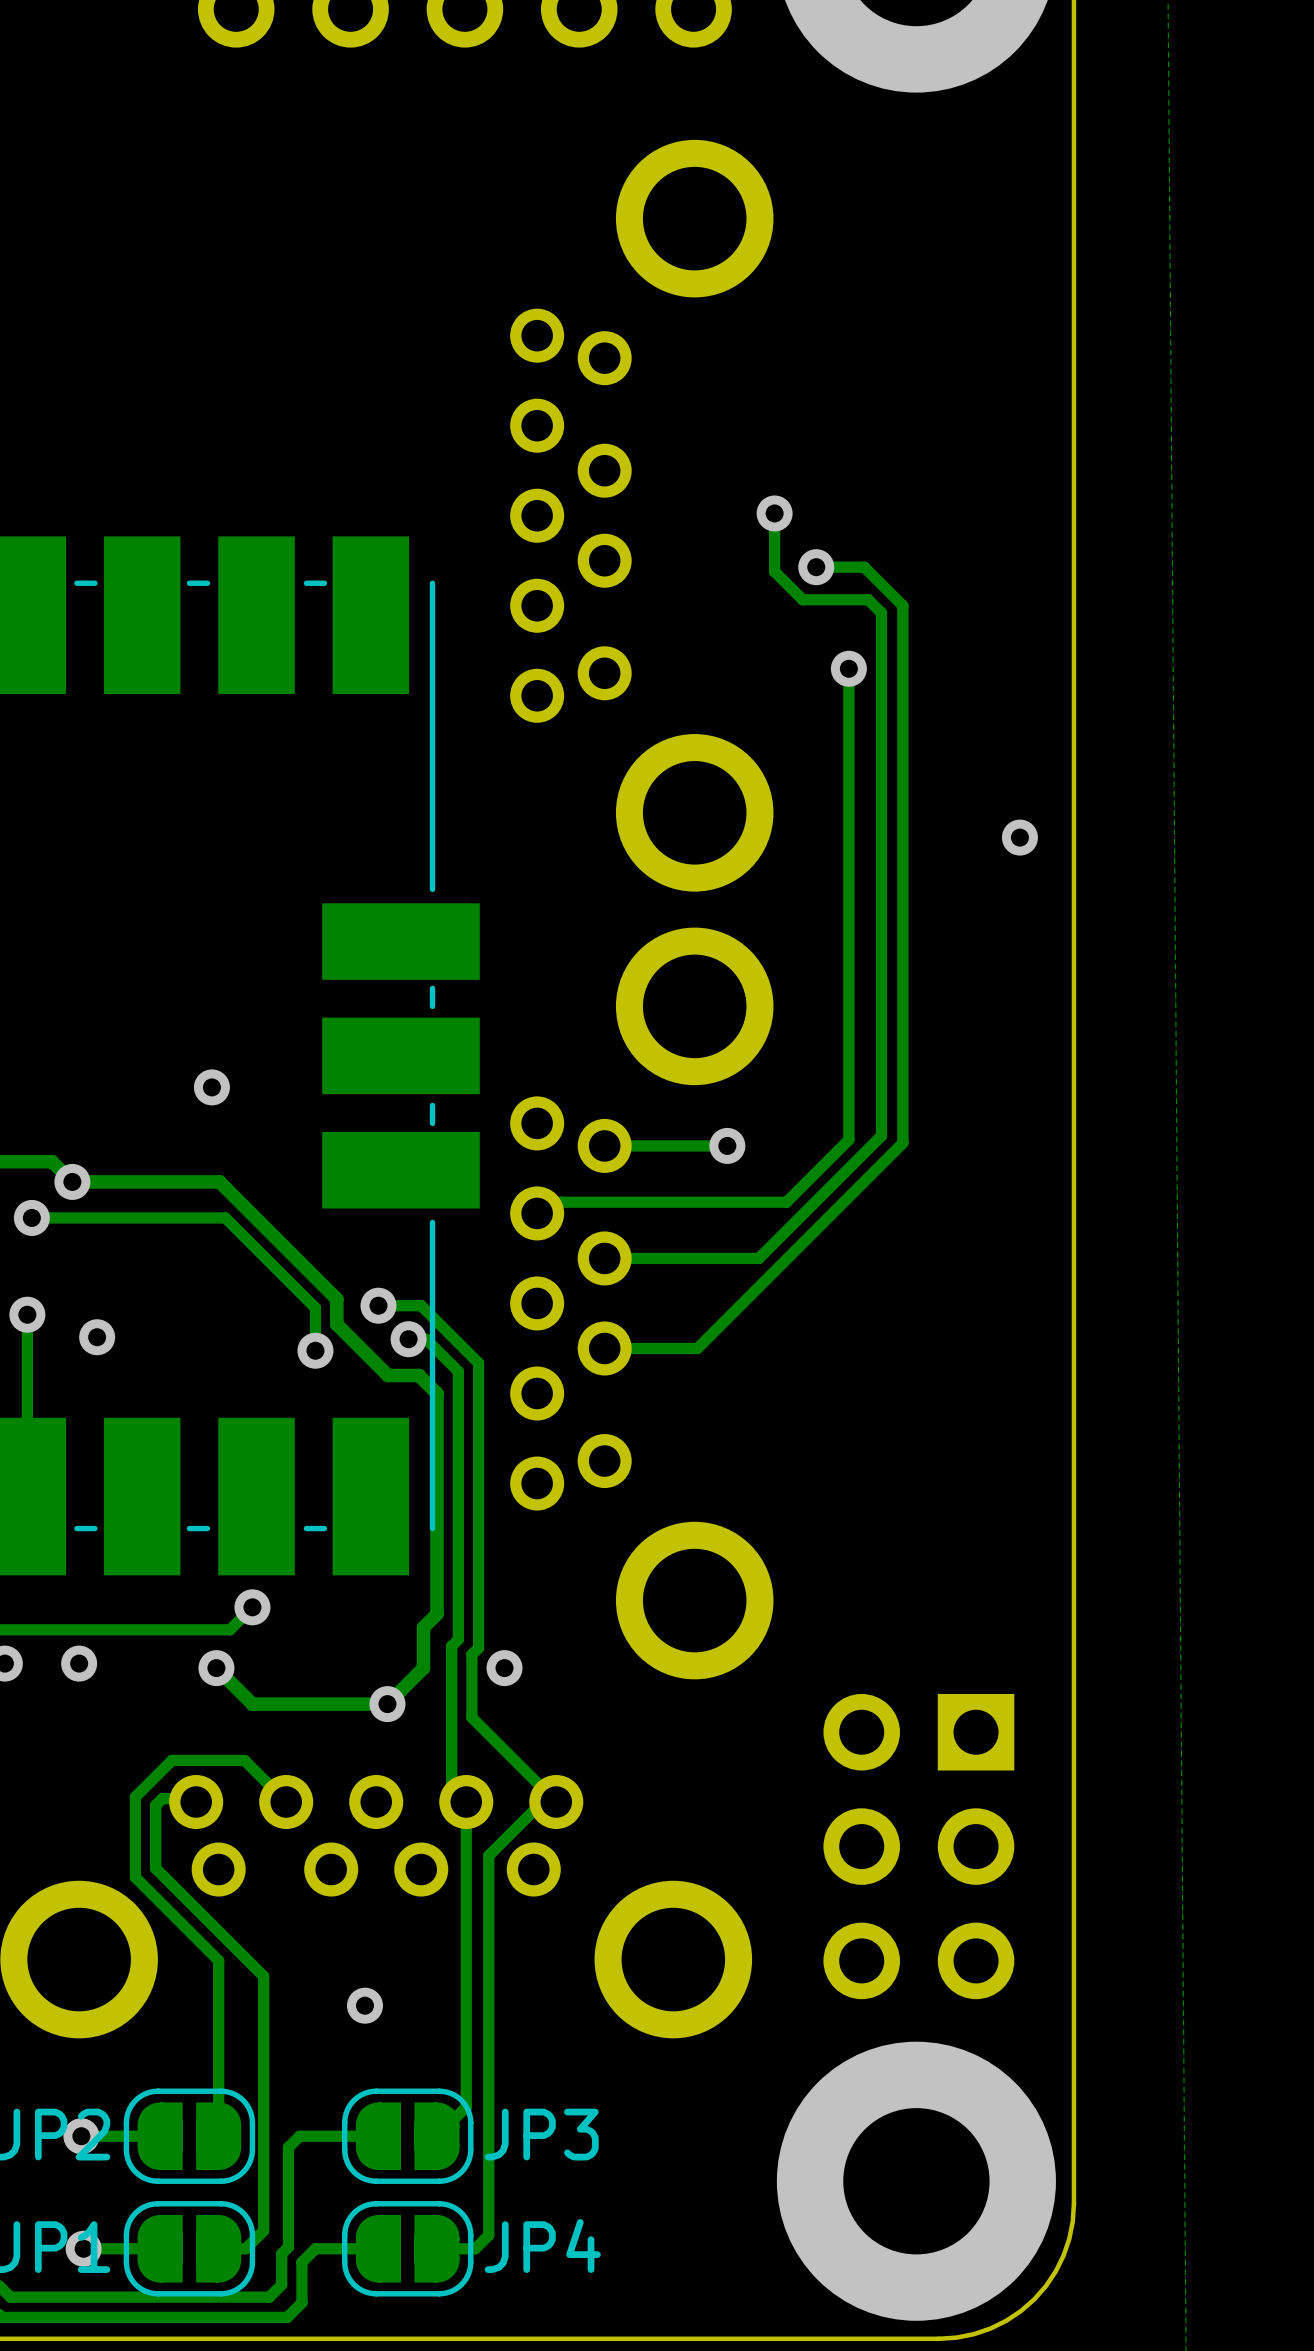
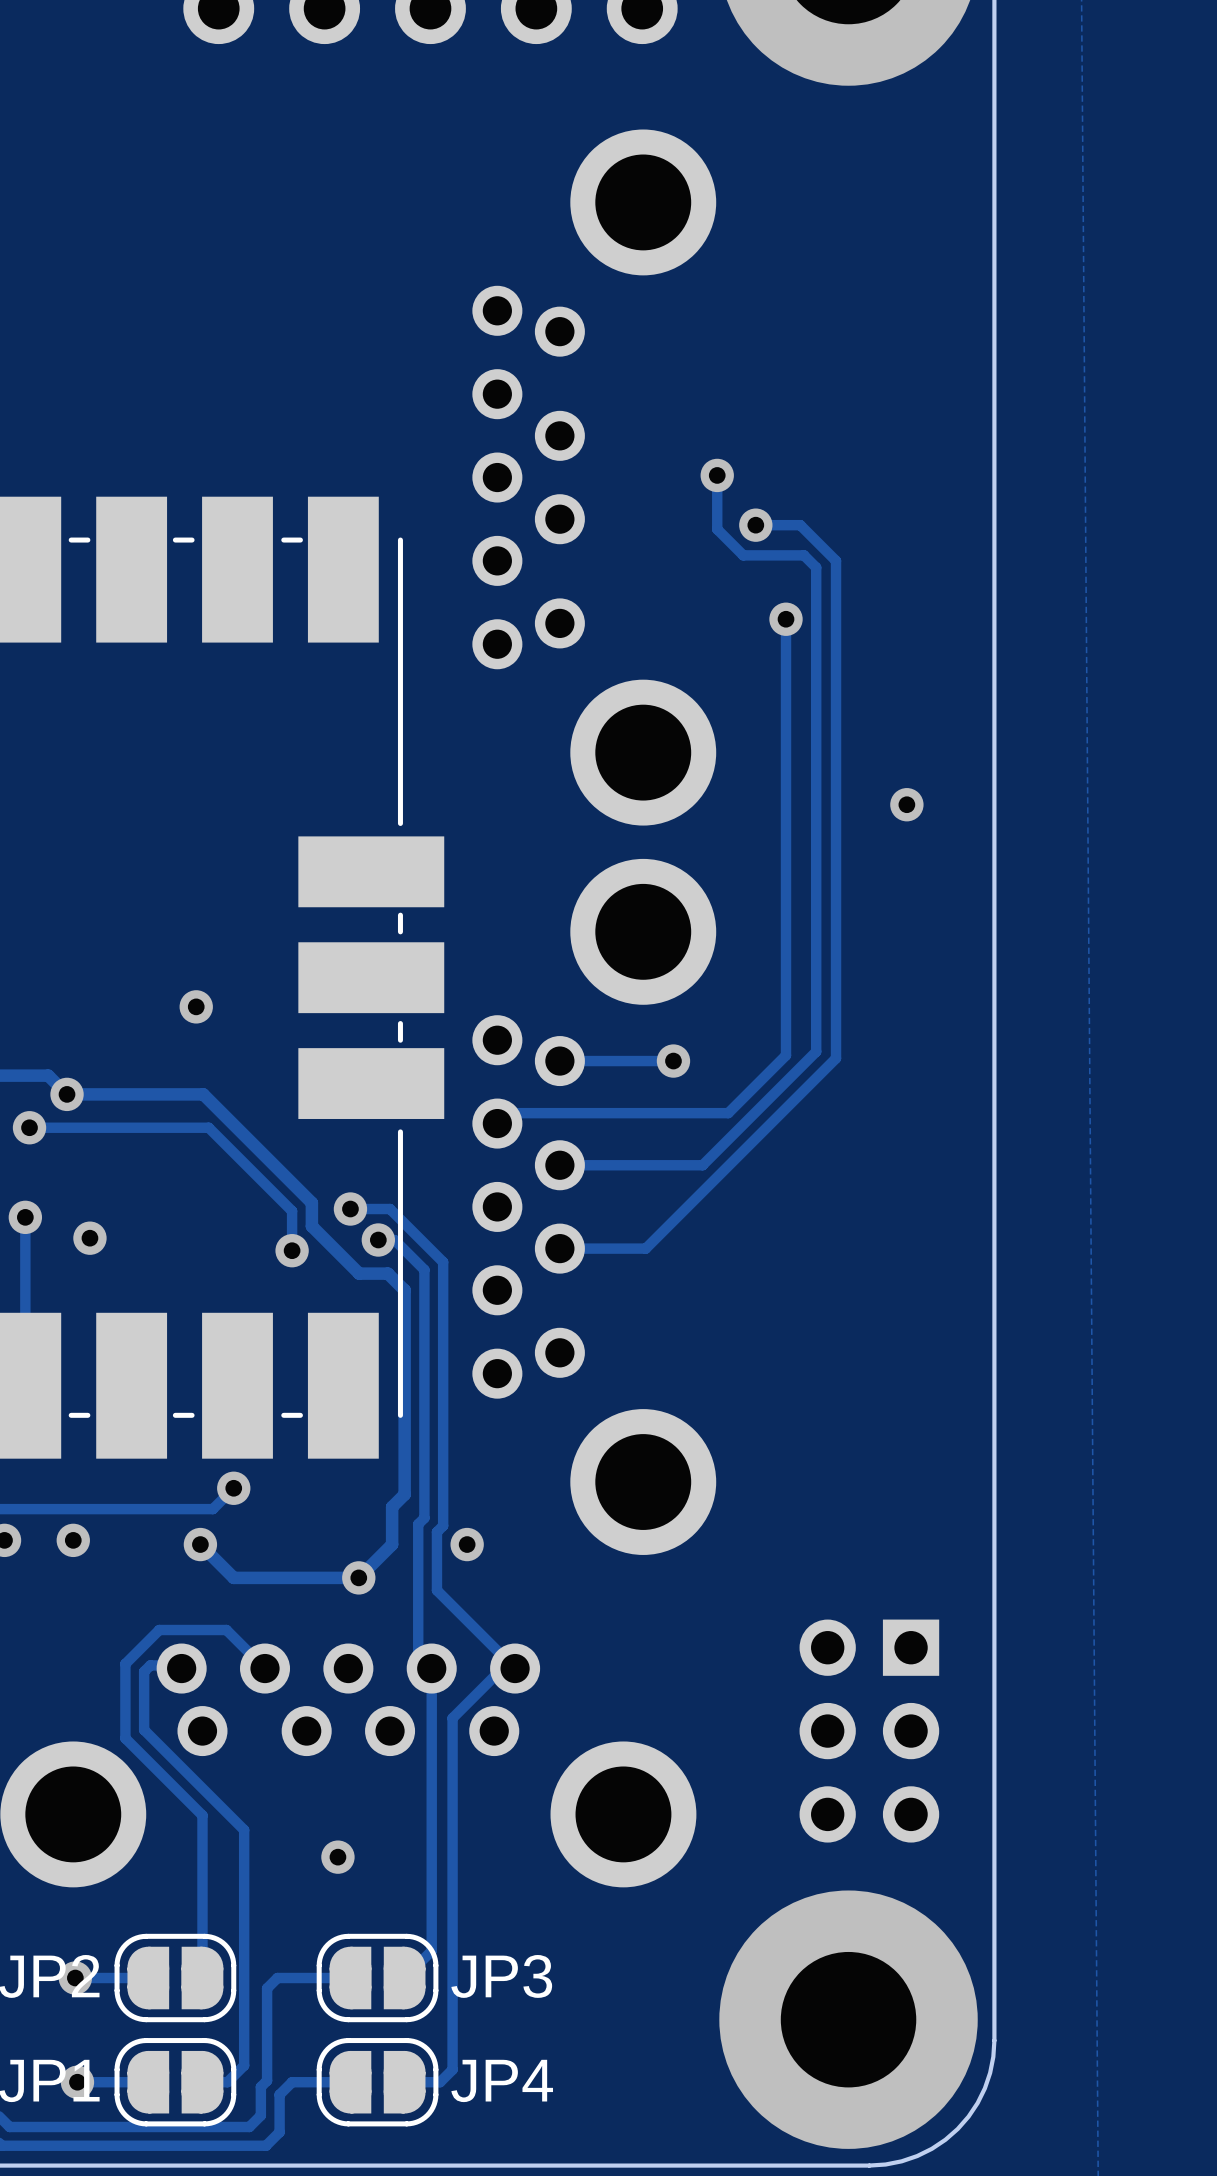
via position: (1019, 837) -> (906, 804)
part footprint: [823, 1693, 1015, 2000] -> [799, 1619, 940, 1843]

